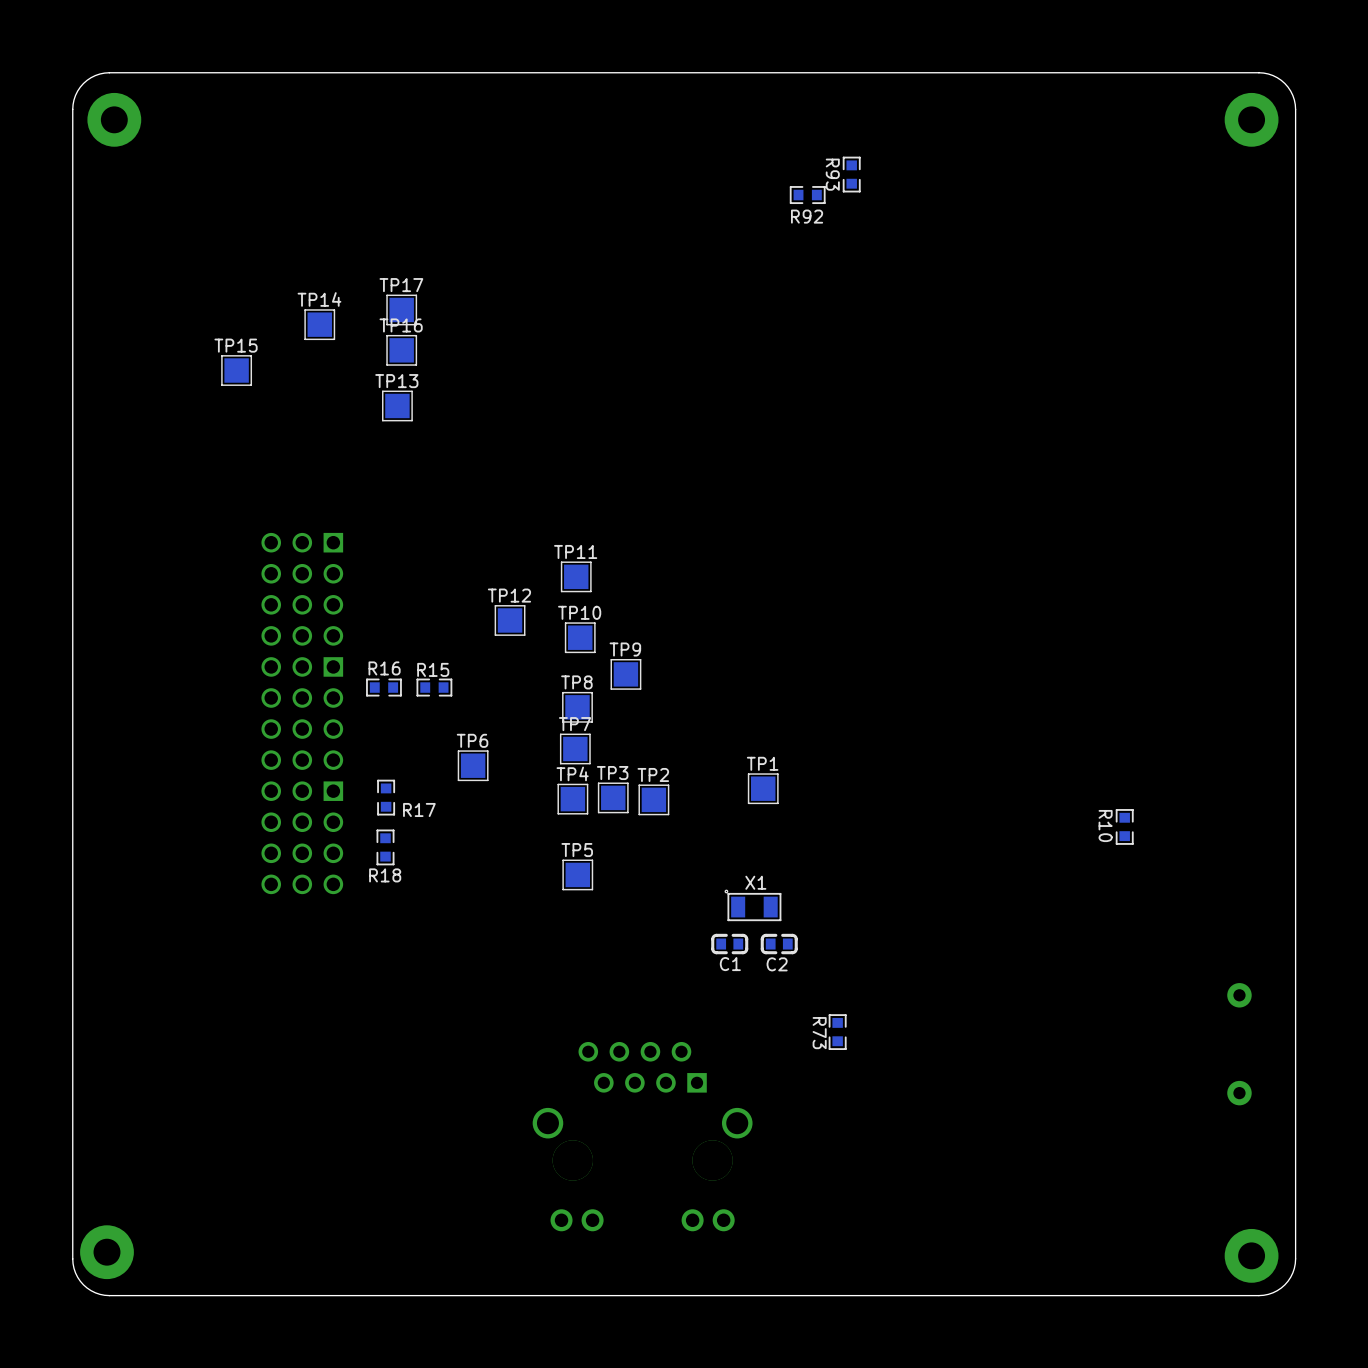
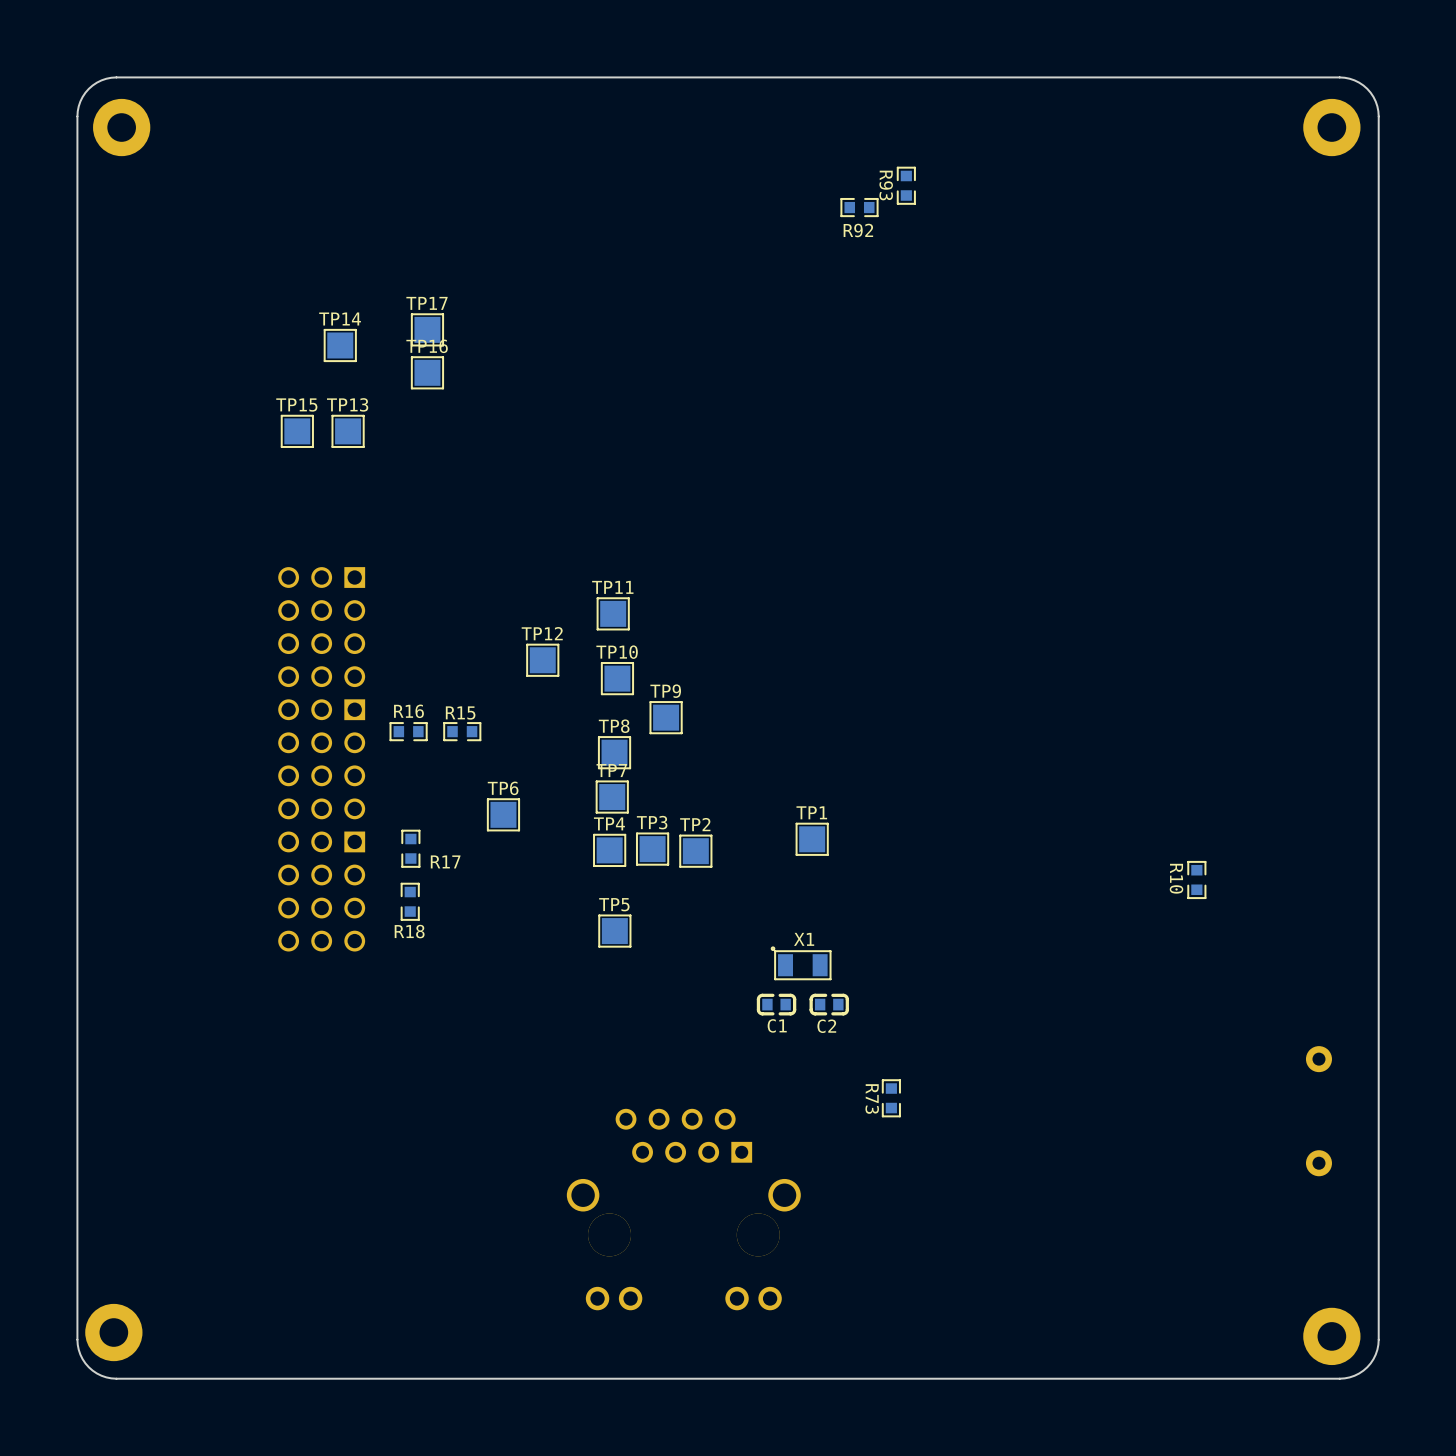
TP15 position: (236, 370) -> (297, 431)
TP13 position: (397, 405) -> (348, 431)

